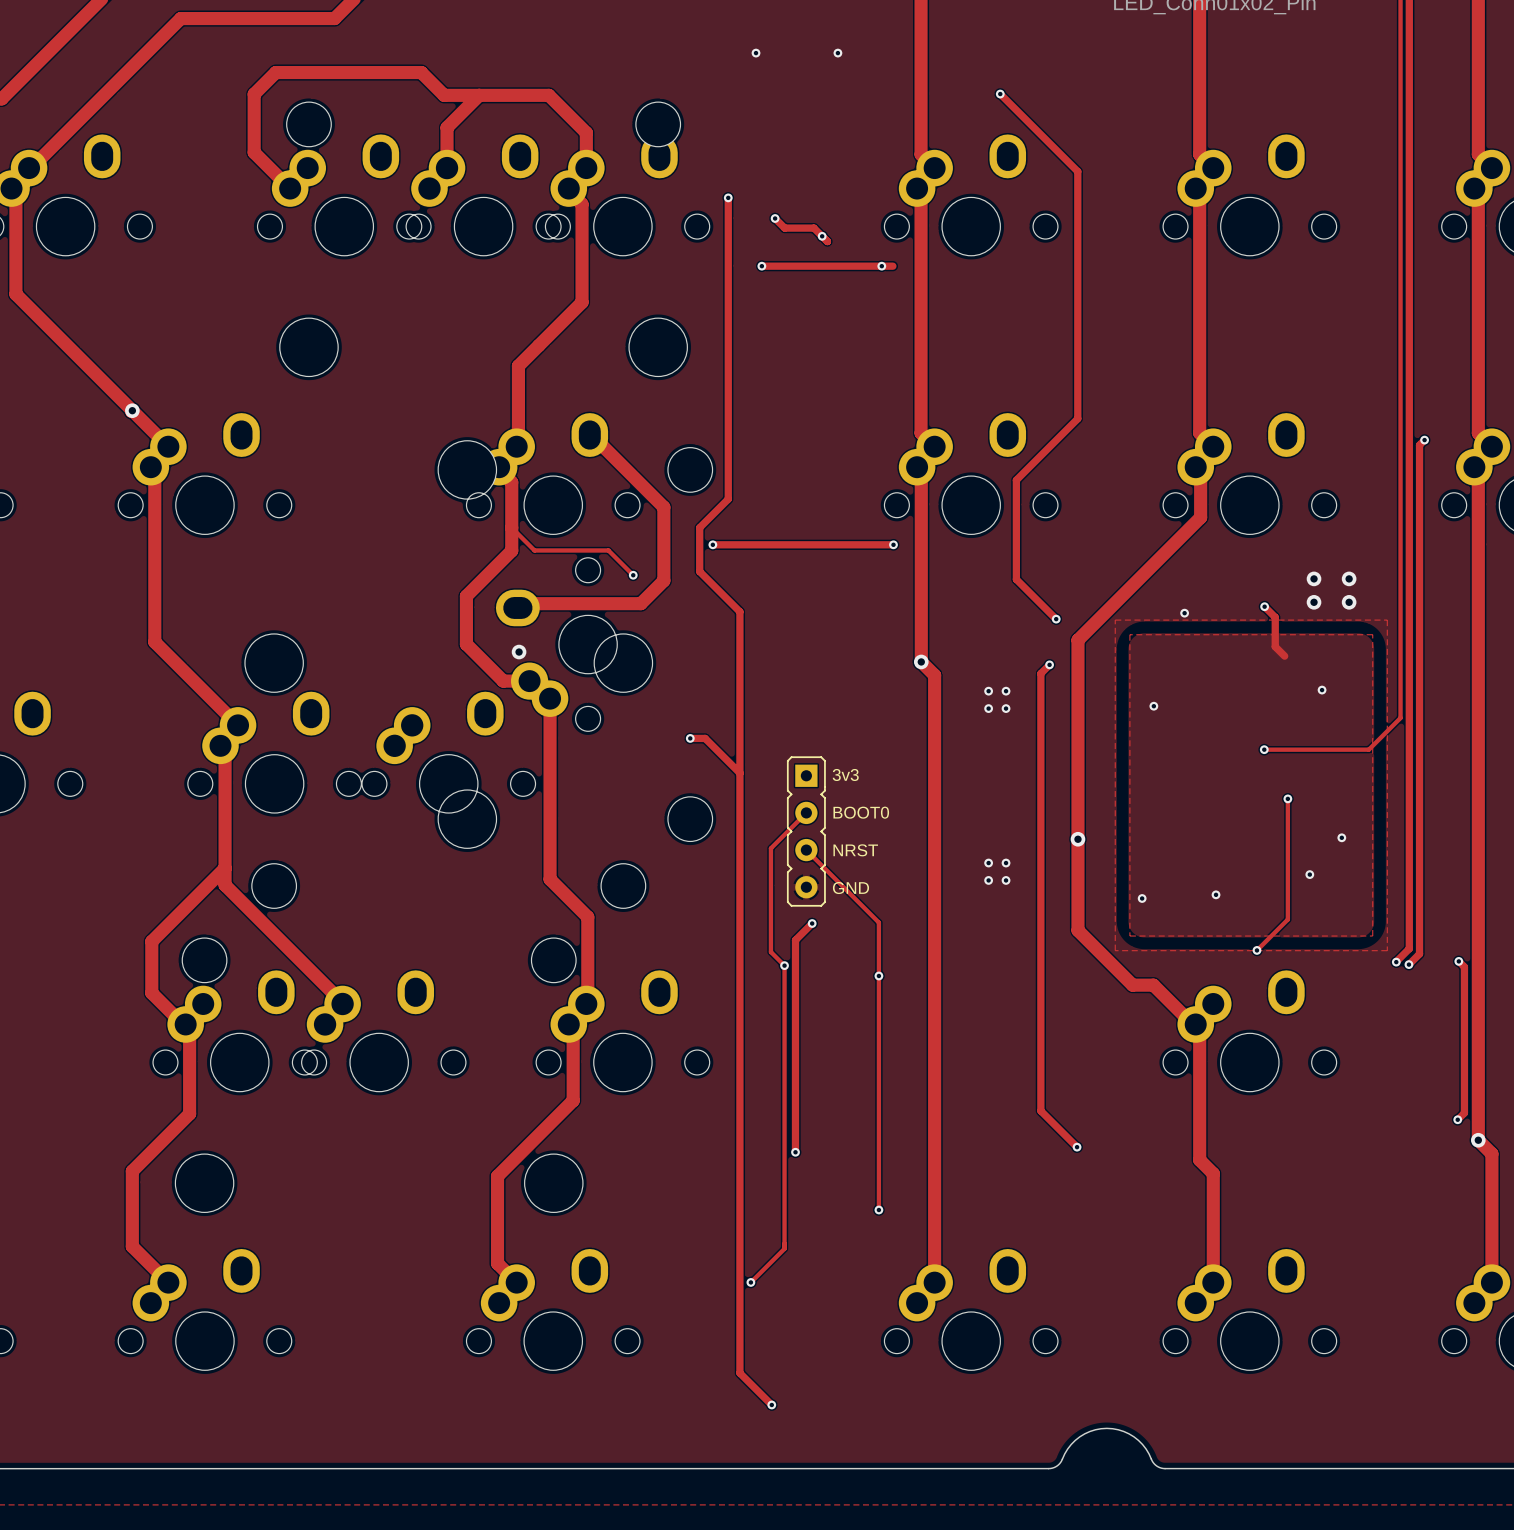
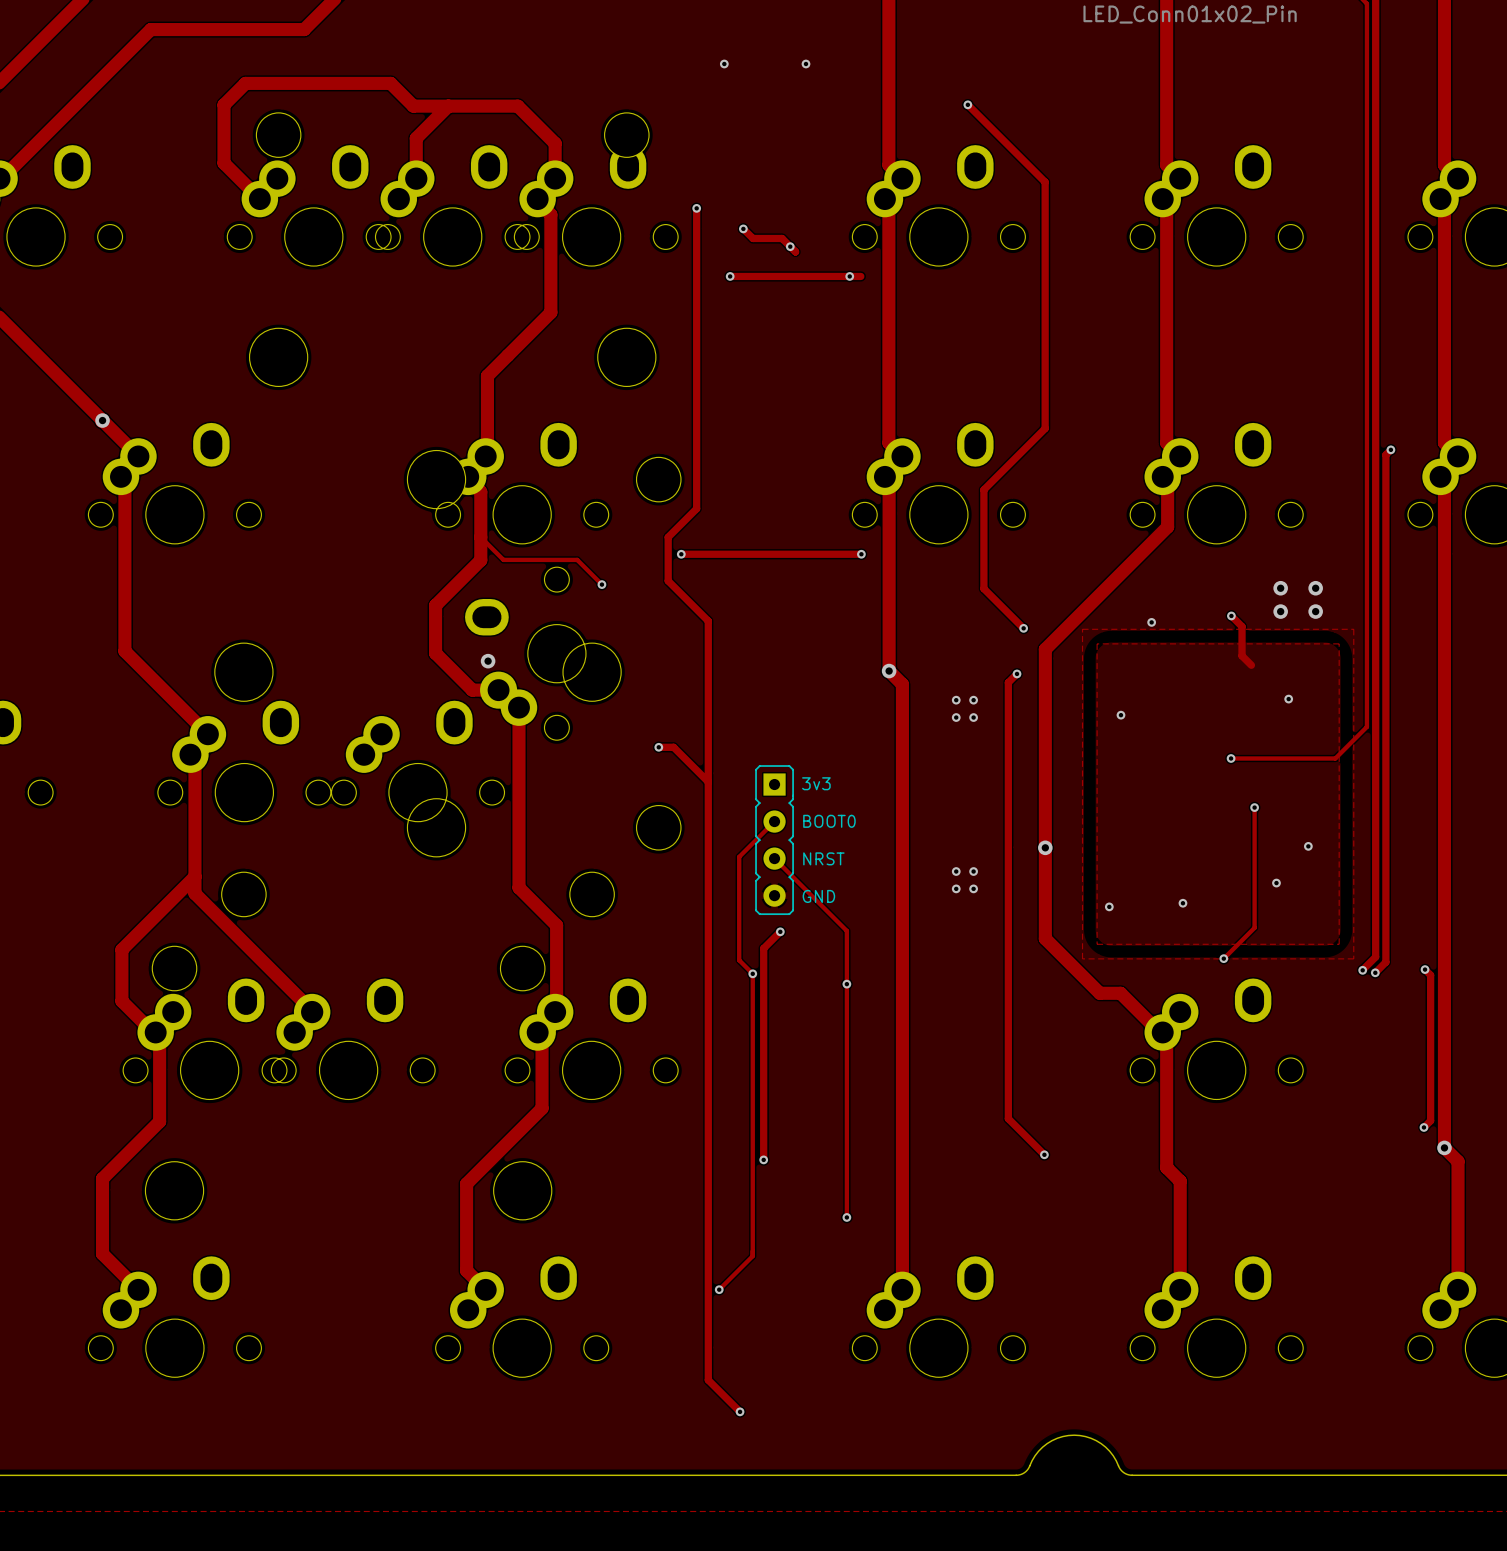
track: (591, 435) (663, 507) (663, 580) (640, 603) (522, 603) (517, 607) -> none

